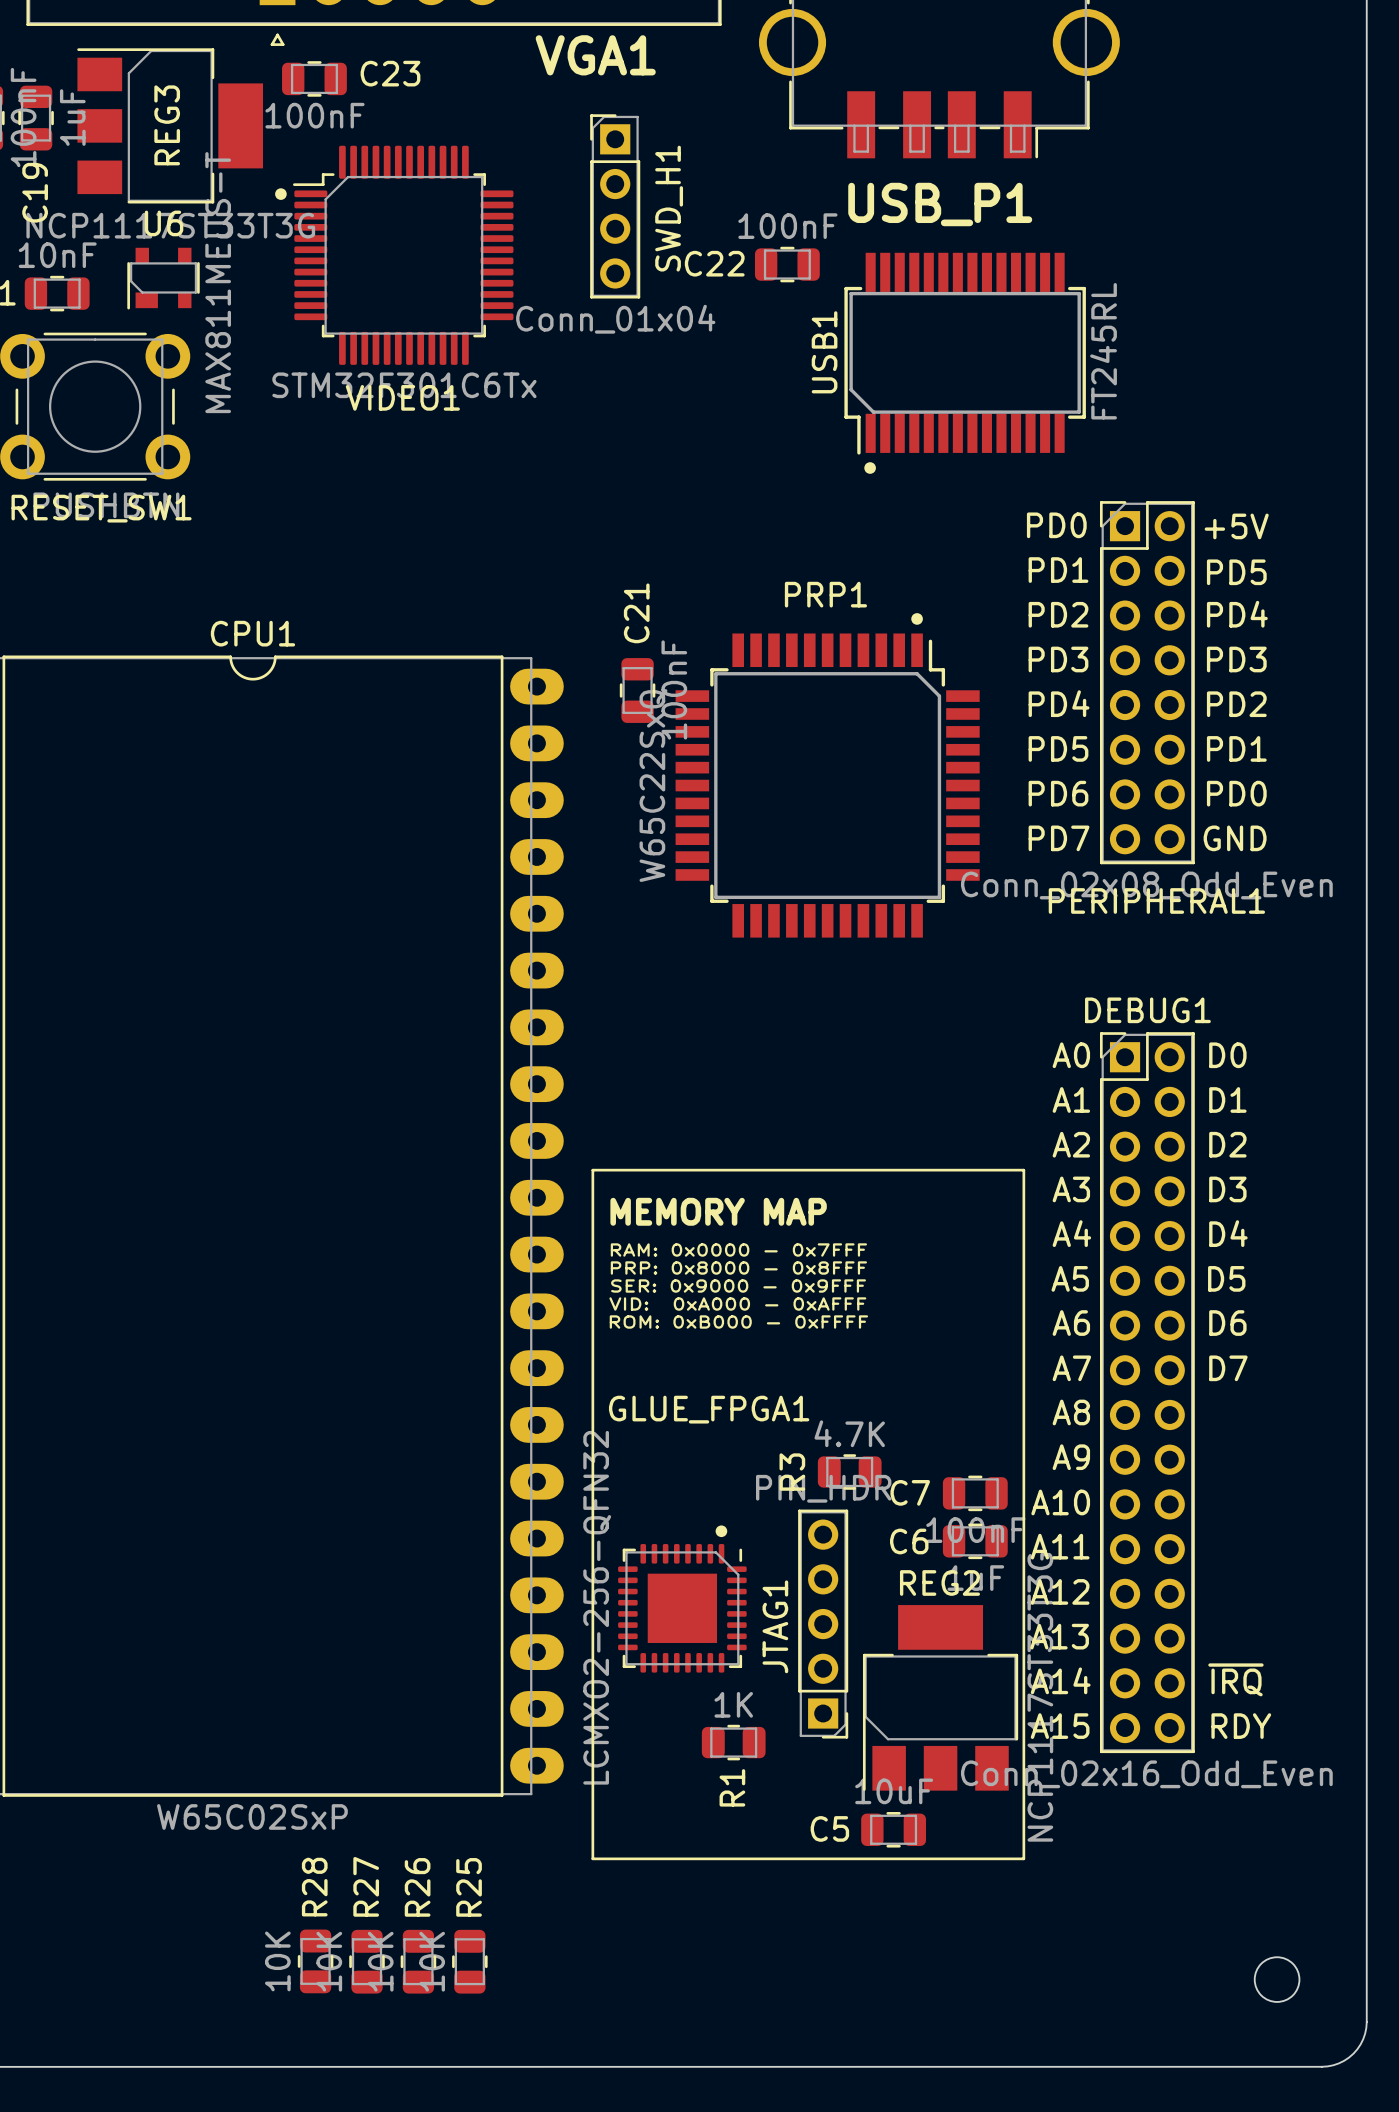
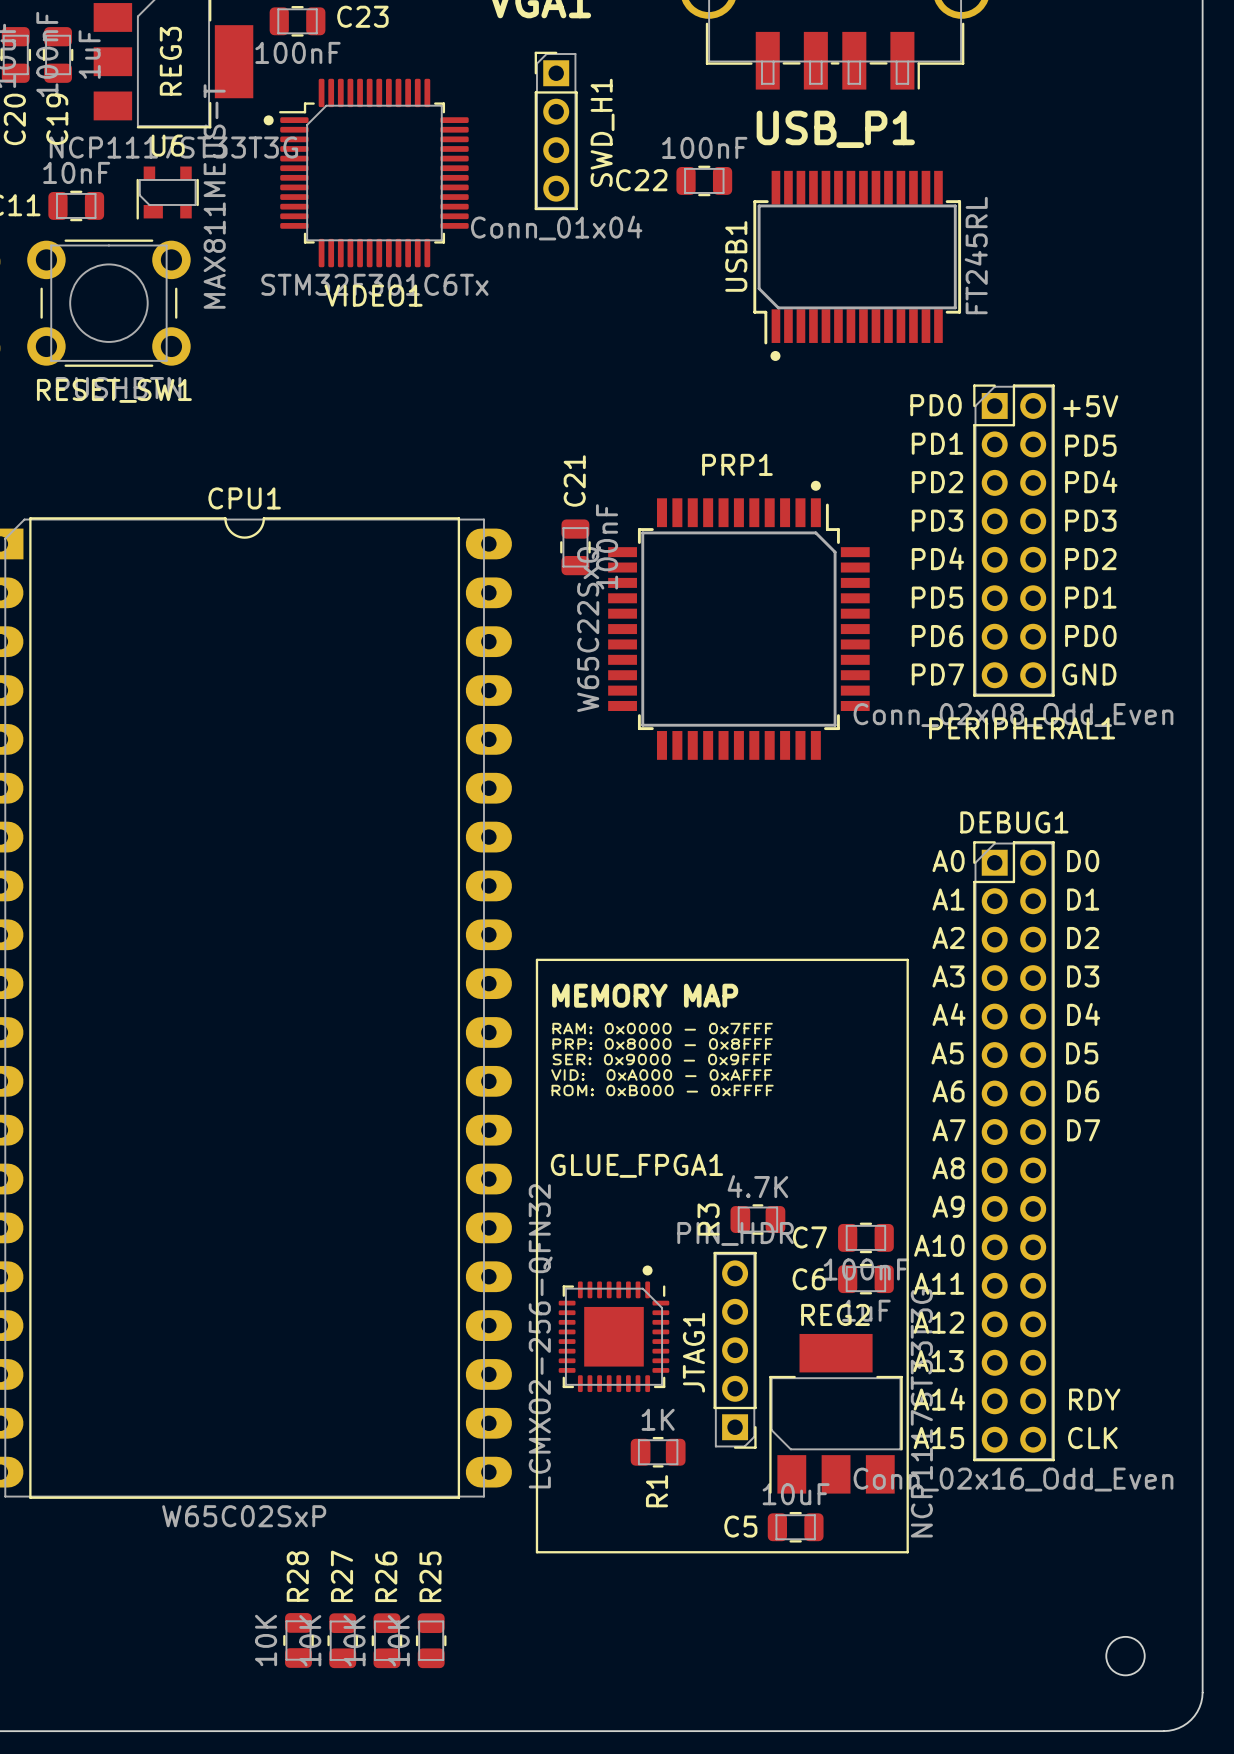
text: ~{IRQ} (1235, 1679) -> RDY (1094, 1399)
text: RDY (1241, 1726) -> CLK (1092, 1438)

